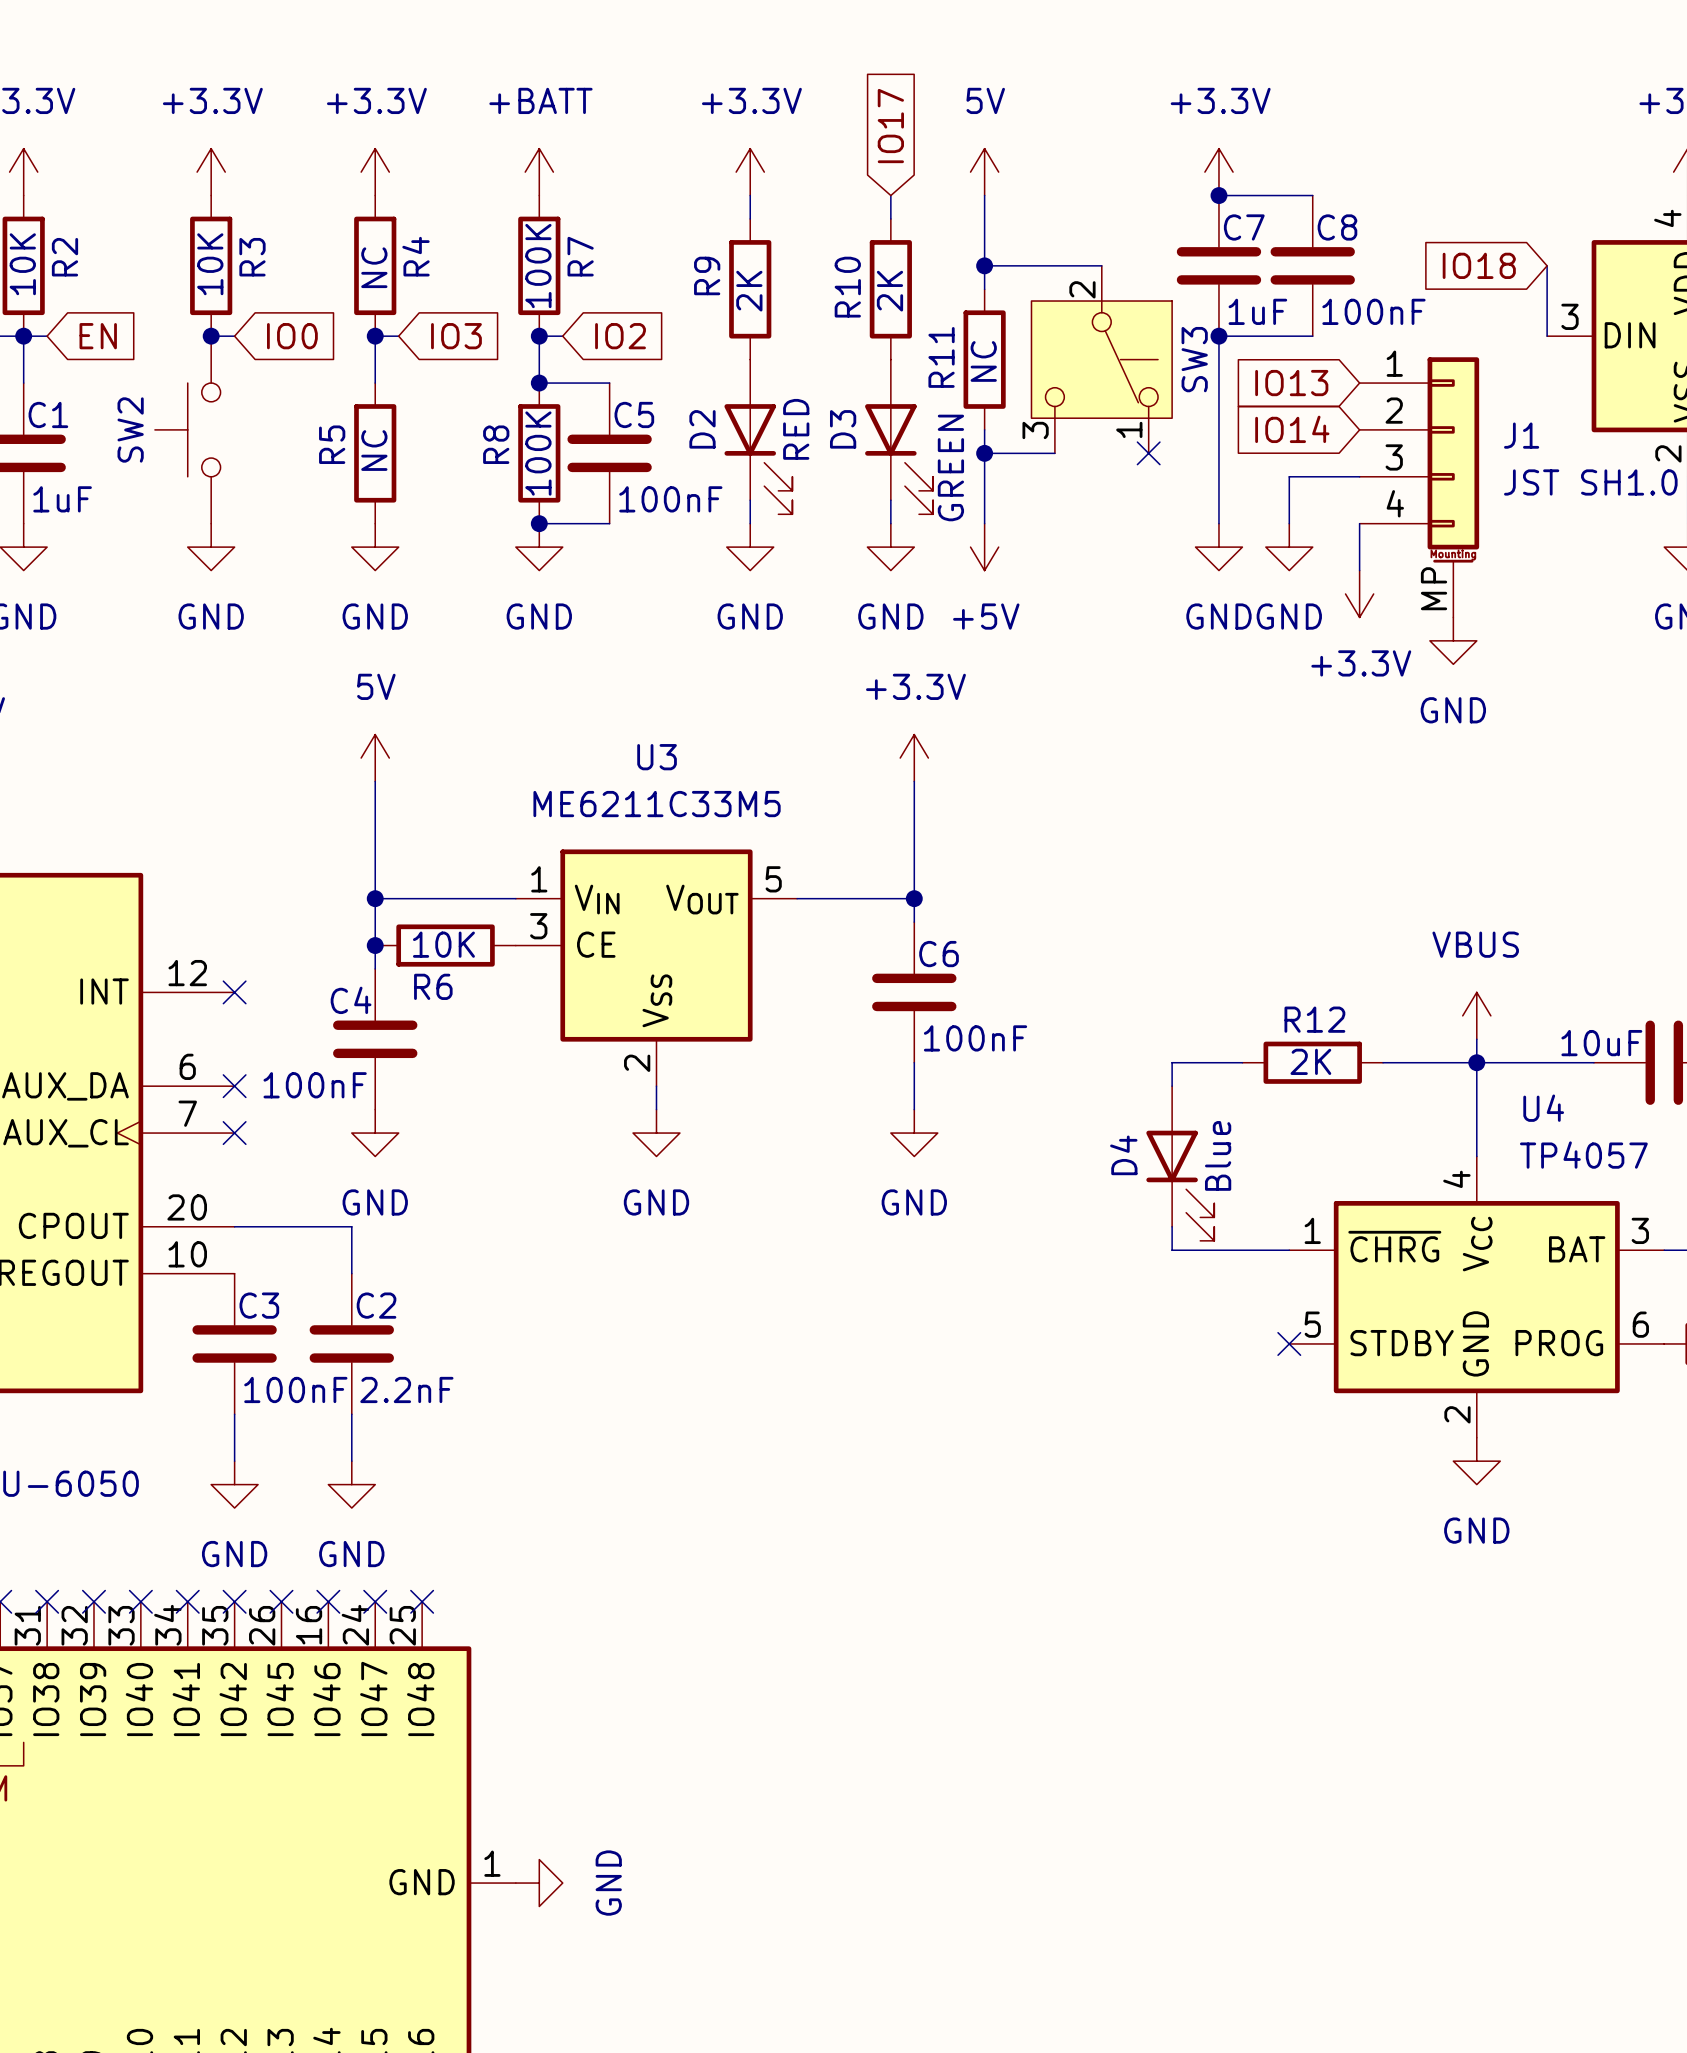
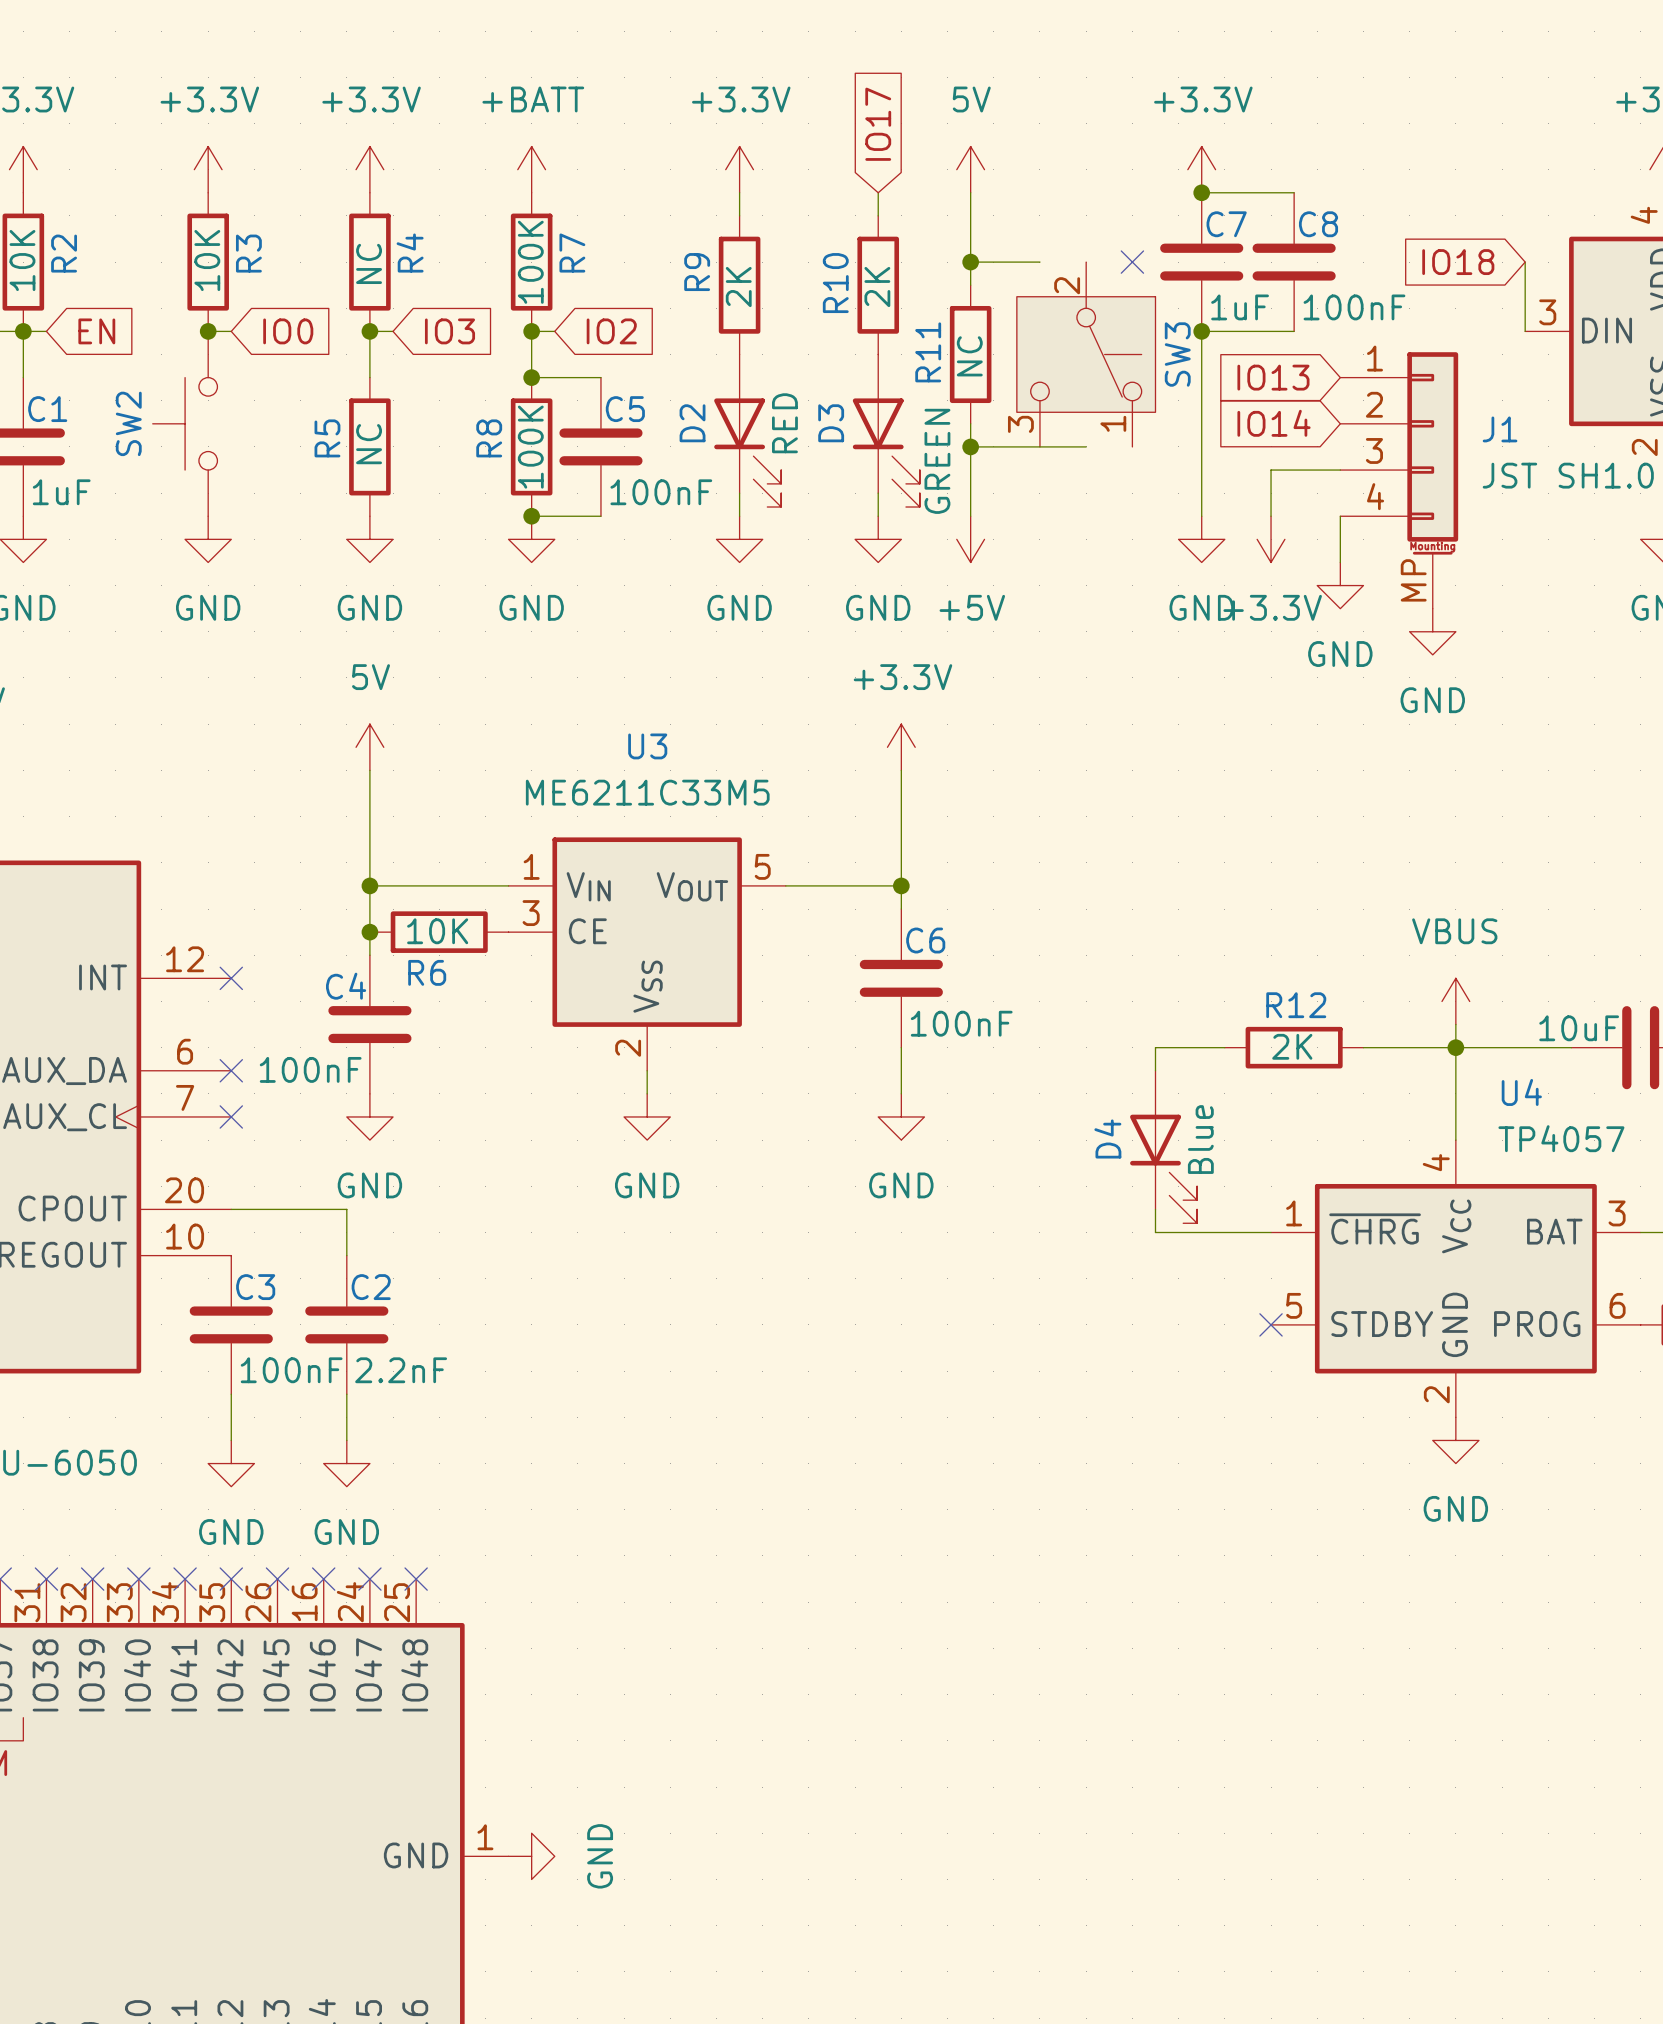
wire: (1054, 265) (1101, 265) -> (1039, 446) (1086, 446)
no-connect mark: none -> (1132, 262)
no-connect mark: (1148, 453) -> none
power symbol: GND (1289, 547) -> +3.3V (1271, 539)
power symbol: +3.3V (1359, 593) -> GND (1340, 585)

